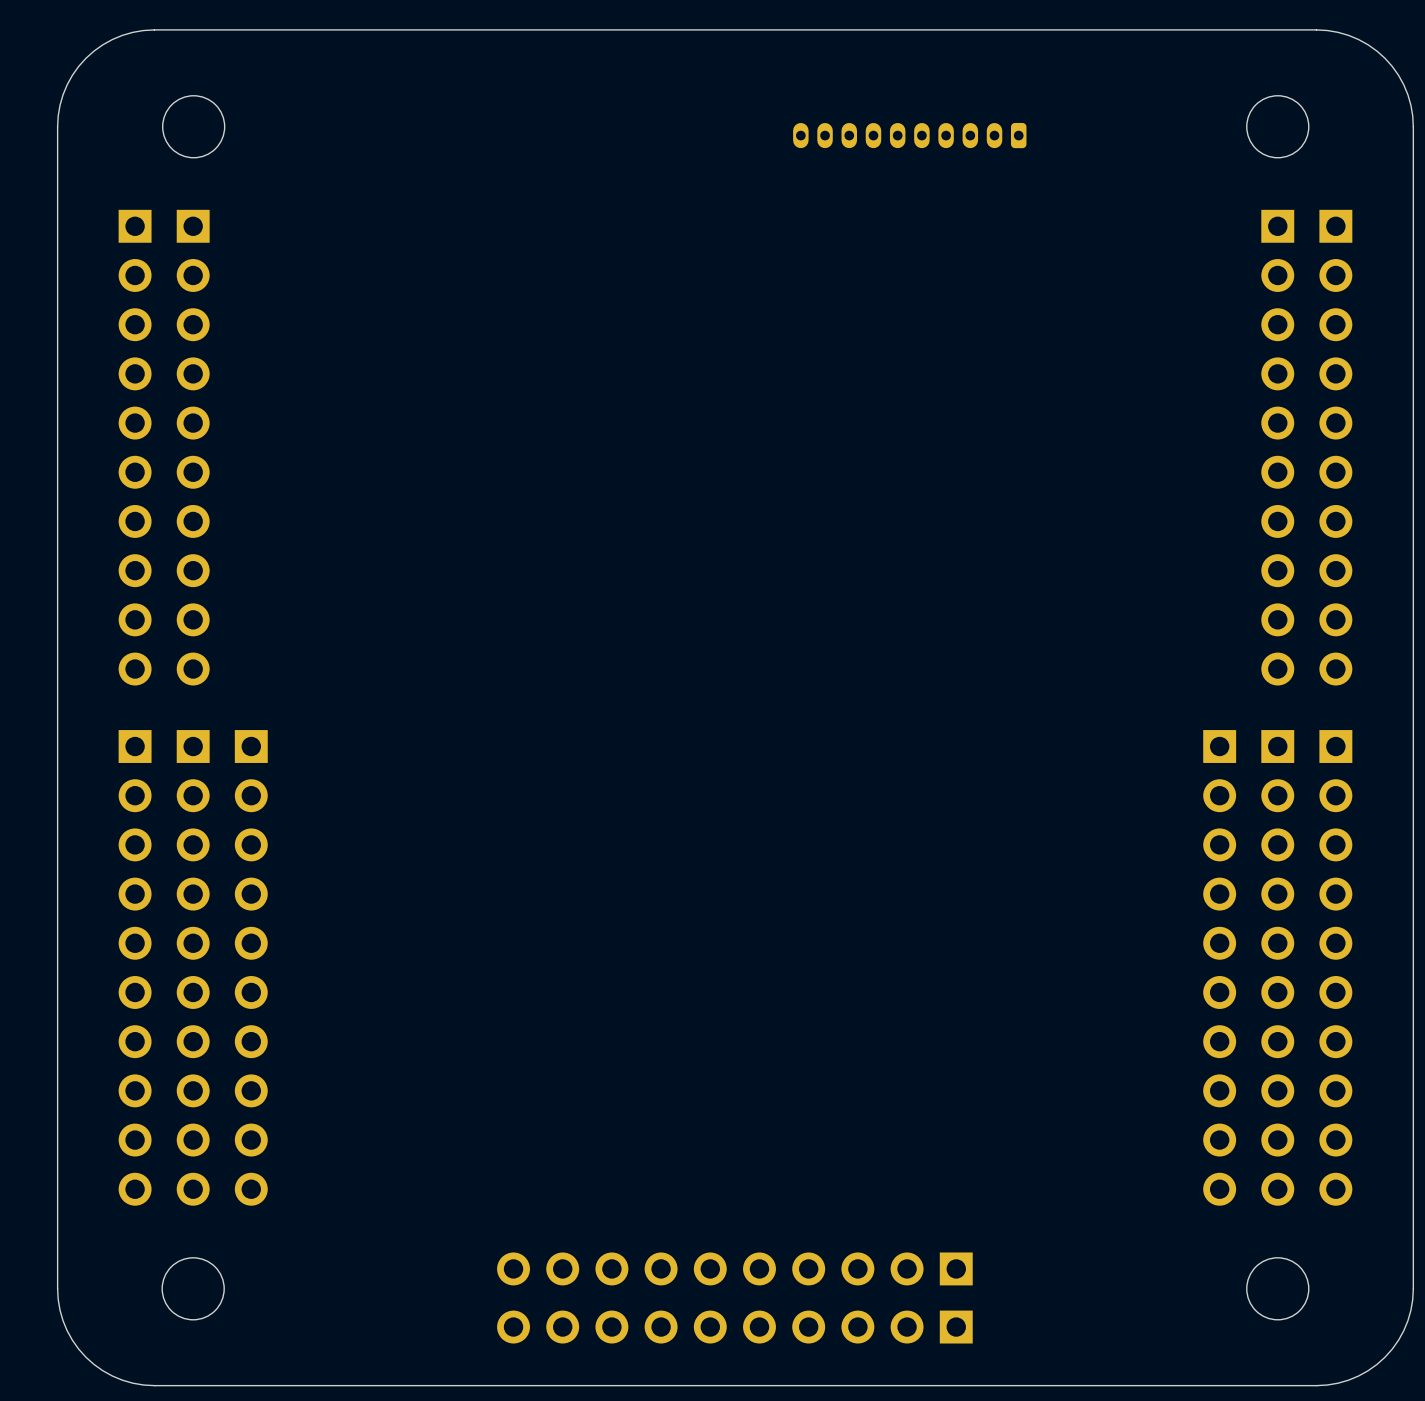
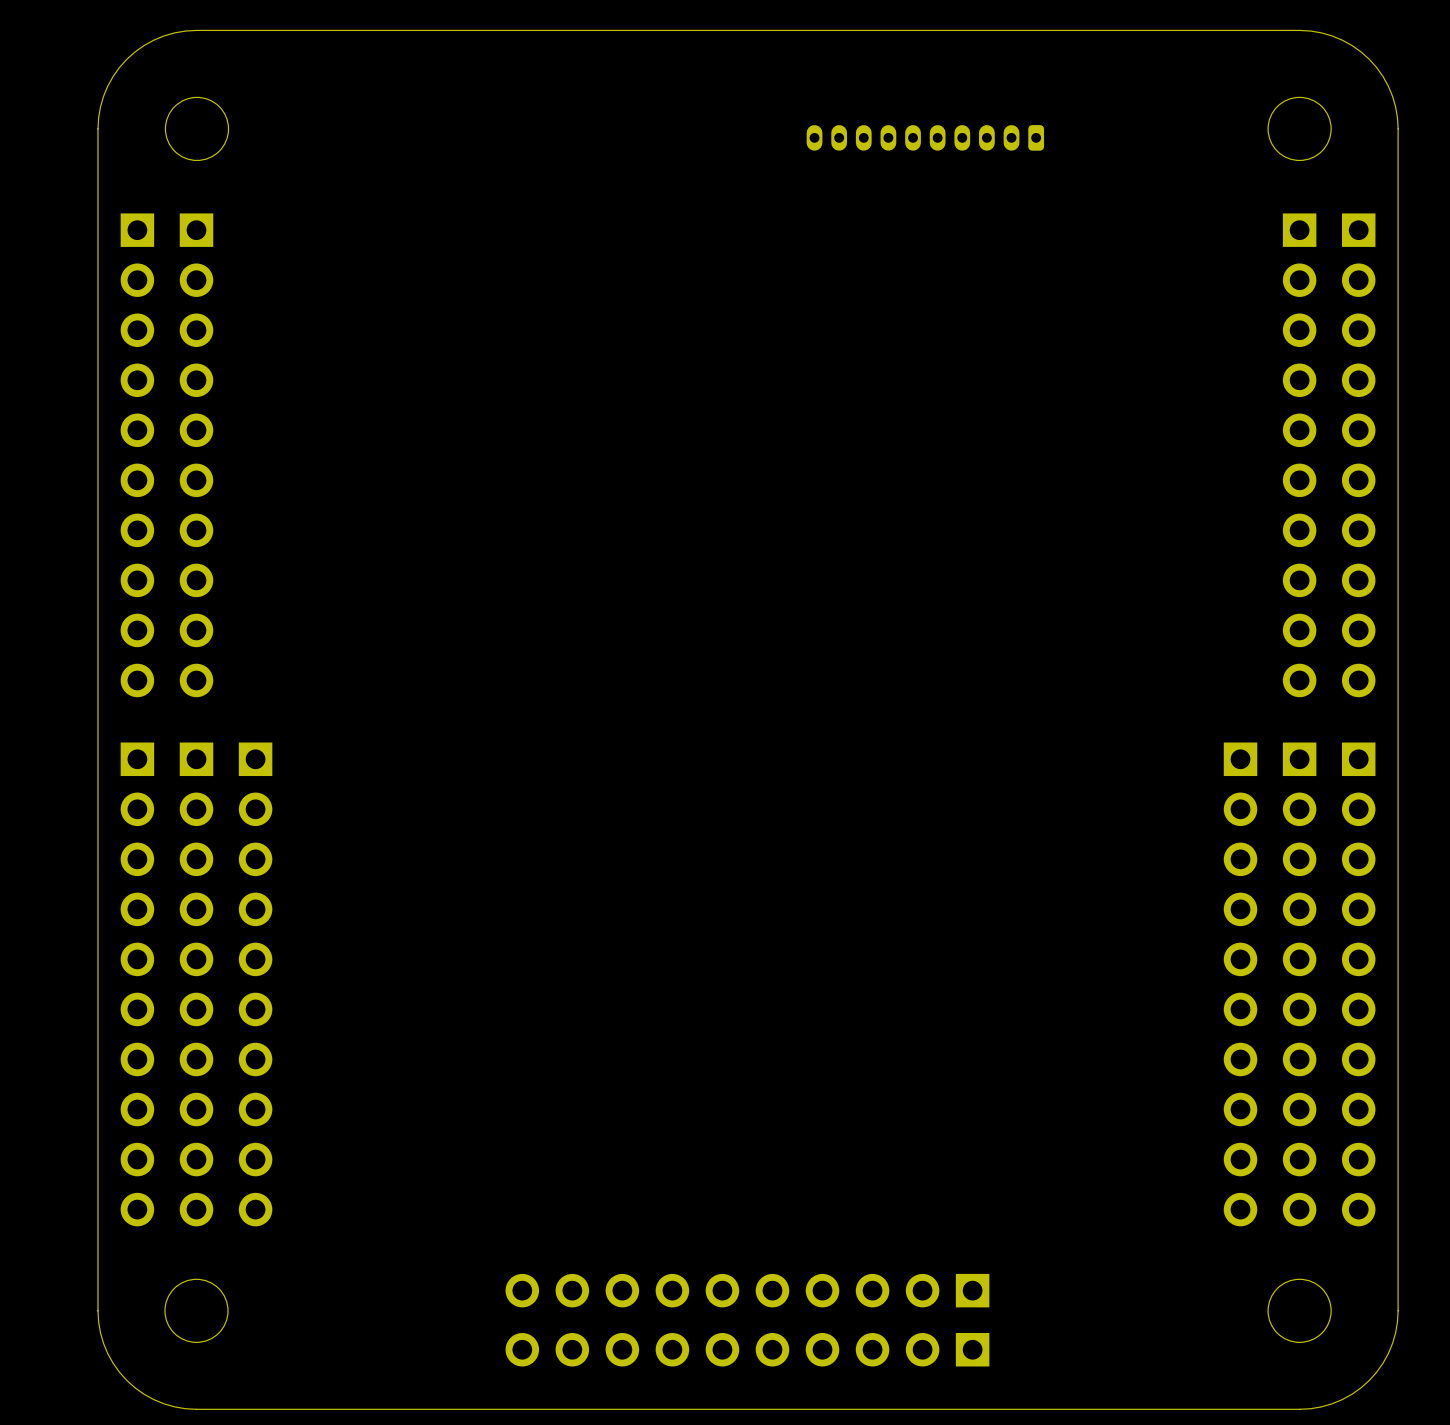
board edge: (193, 29) (154, 29) (132, 32) (112, 39) (94, 51) (78, 66) (67, 84) (60, 105) (57, 126) (58, 1299) (63, 1320) (72, 1340) (85, 1357) (102, 1370) (122, 1380) (143, 1385) (193, 1385) -> (196, 30) (163, 35) (144, 45) (126, 59) (113, 76) (103, 96) (98, 128) (98, 1321) (107, 1353) (119, 1372) (135, 1387) (163, 1403) (196, 1409)
board edge: (1277, 29) (1316, 29) (1338, 32) (1358, 39) (1376, 51) (1392, 66) (1403, 84) (1410, 105) (1413, 126) (1412, 1299) (1407, 1320) (1398, 1340) (1384, 1357) (1368, 1370) (1348, 1380) (1327, 1385) (1277, 1385) -> (1299, 30) (1321, 32) (1342, 40) (1369, 59) (1388, 86) (1395, 107) (1398, 128) (1397, 1321) (1392, 1343) (1383, 1363) (1361, 1387) (1332, 1403) (1299, 1409)

